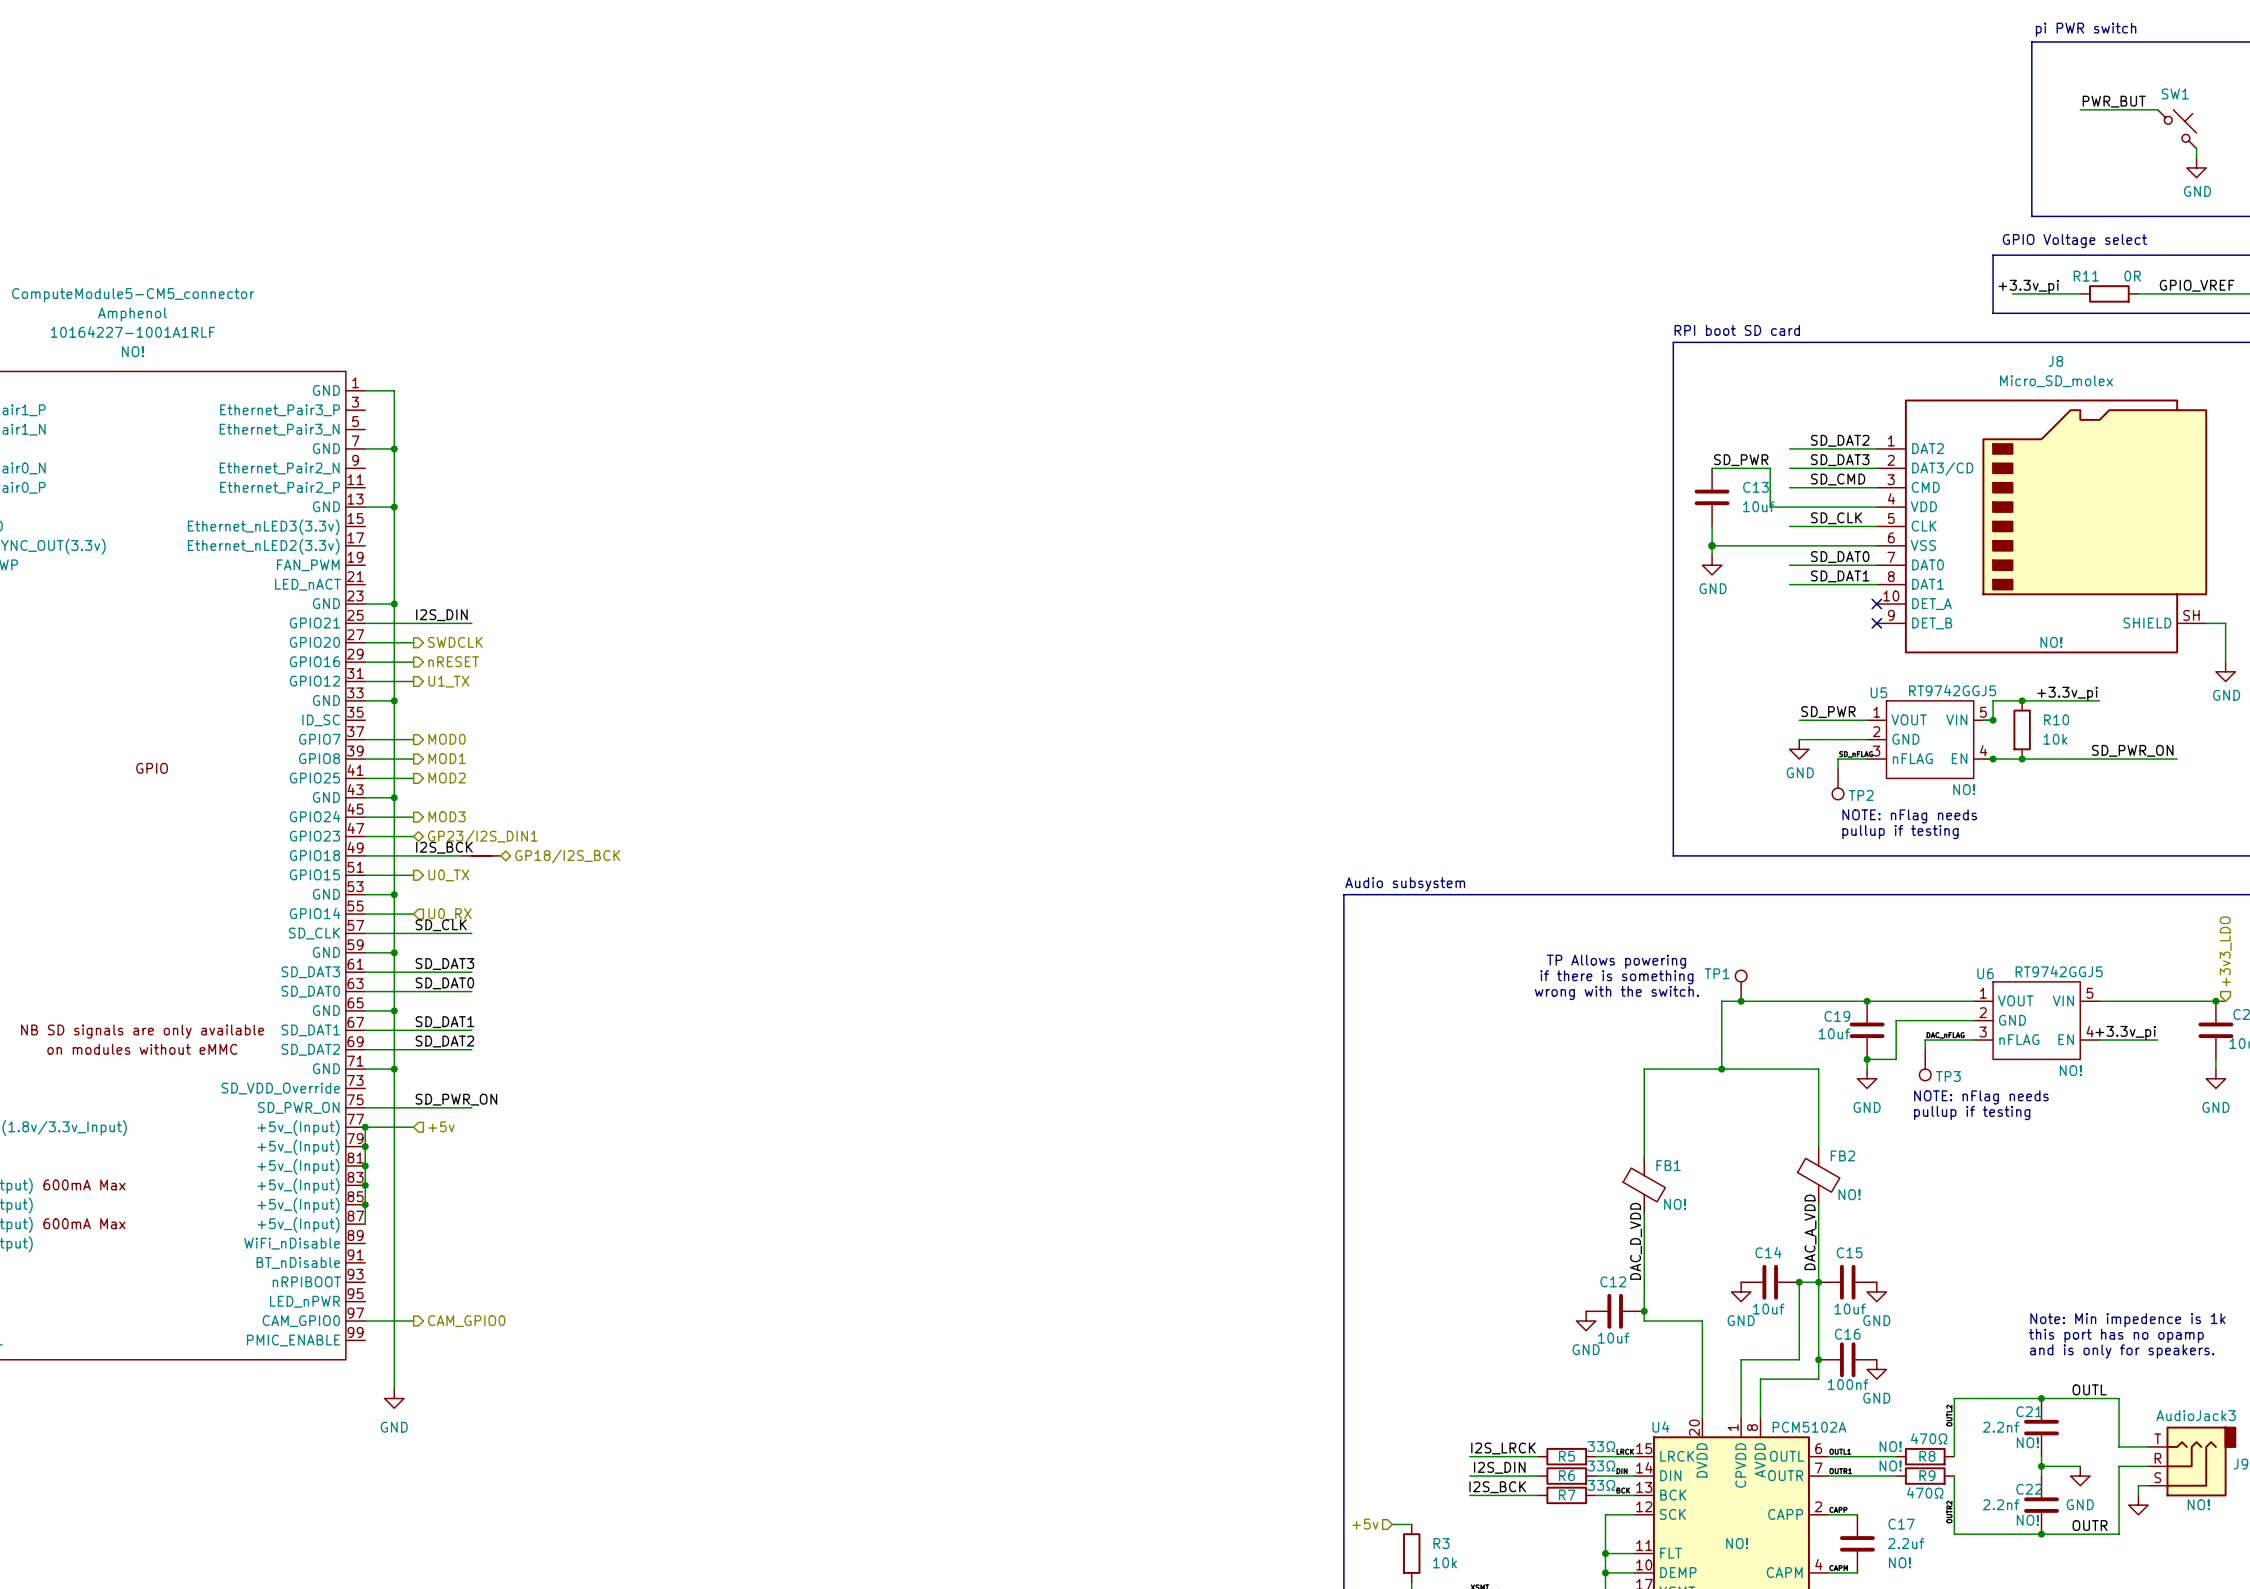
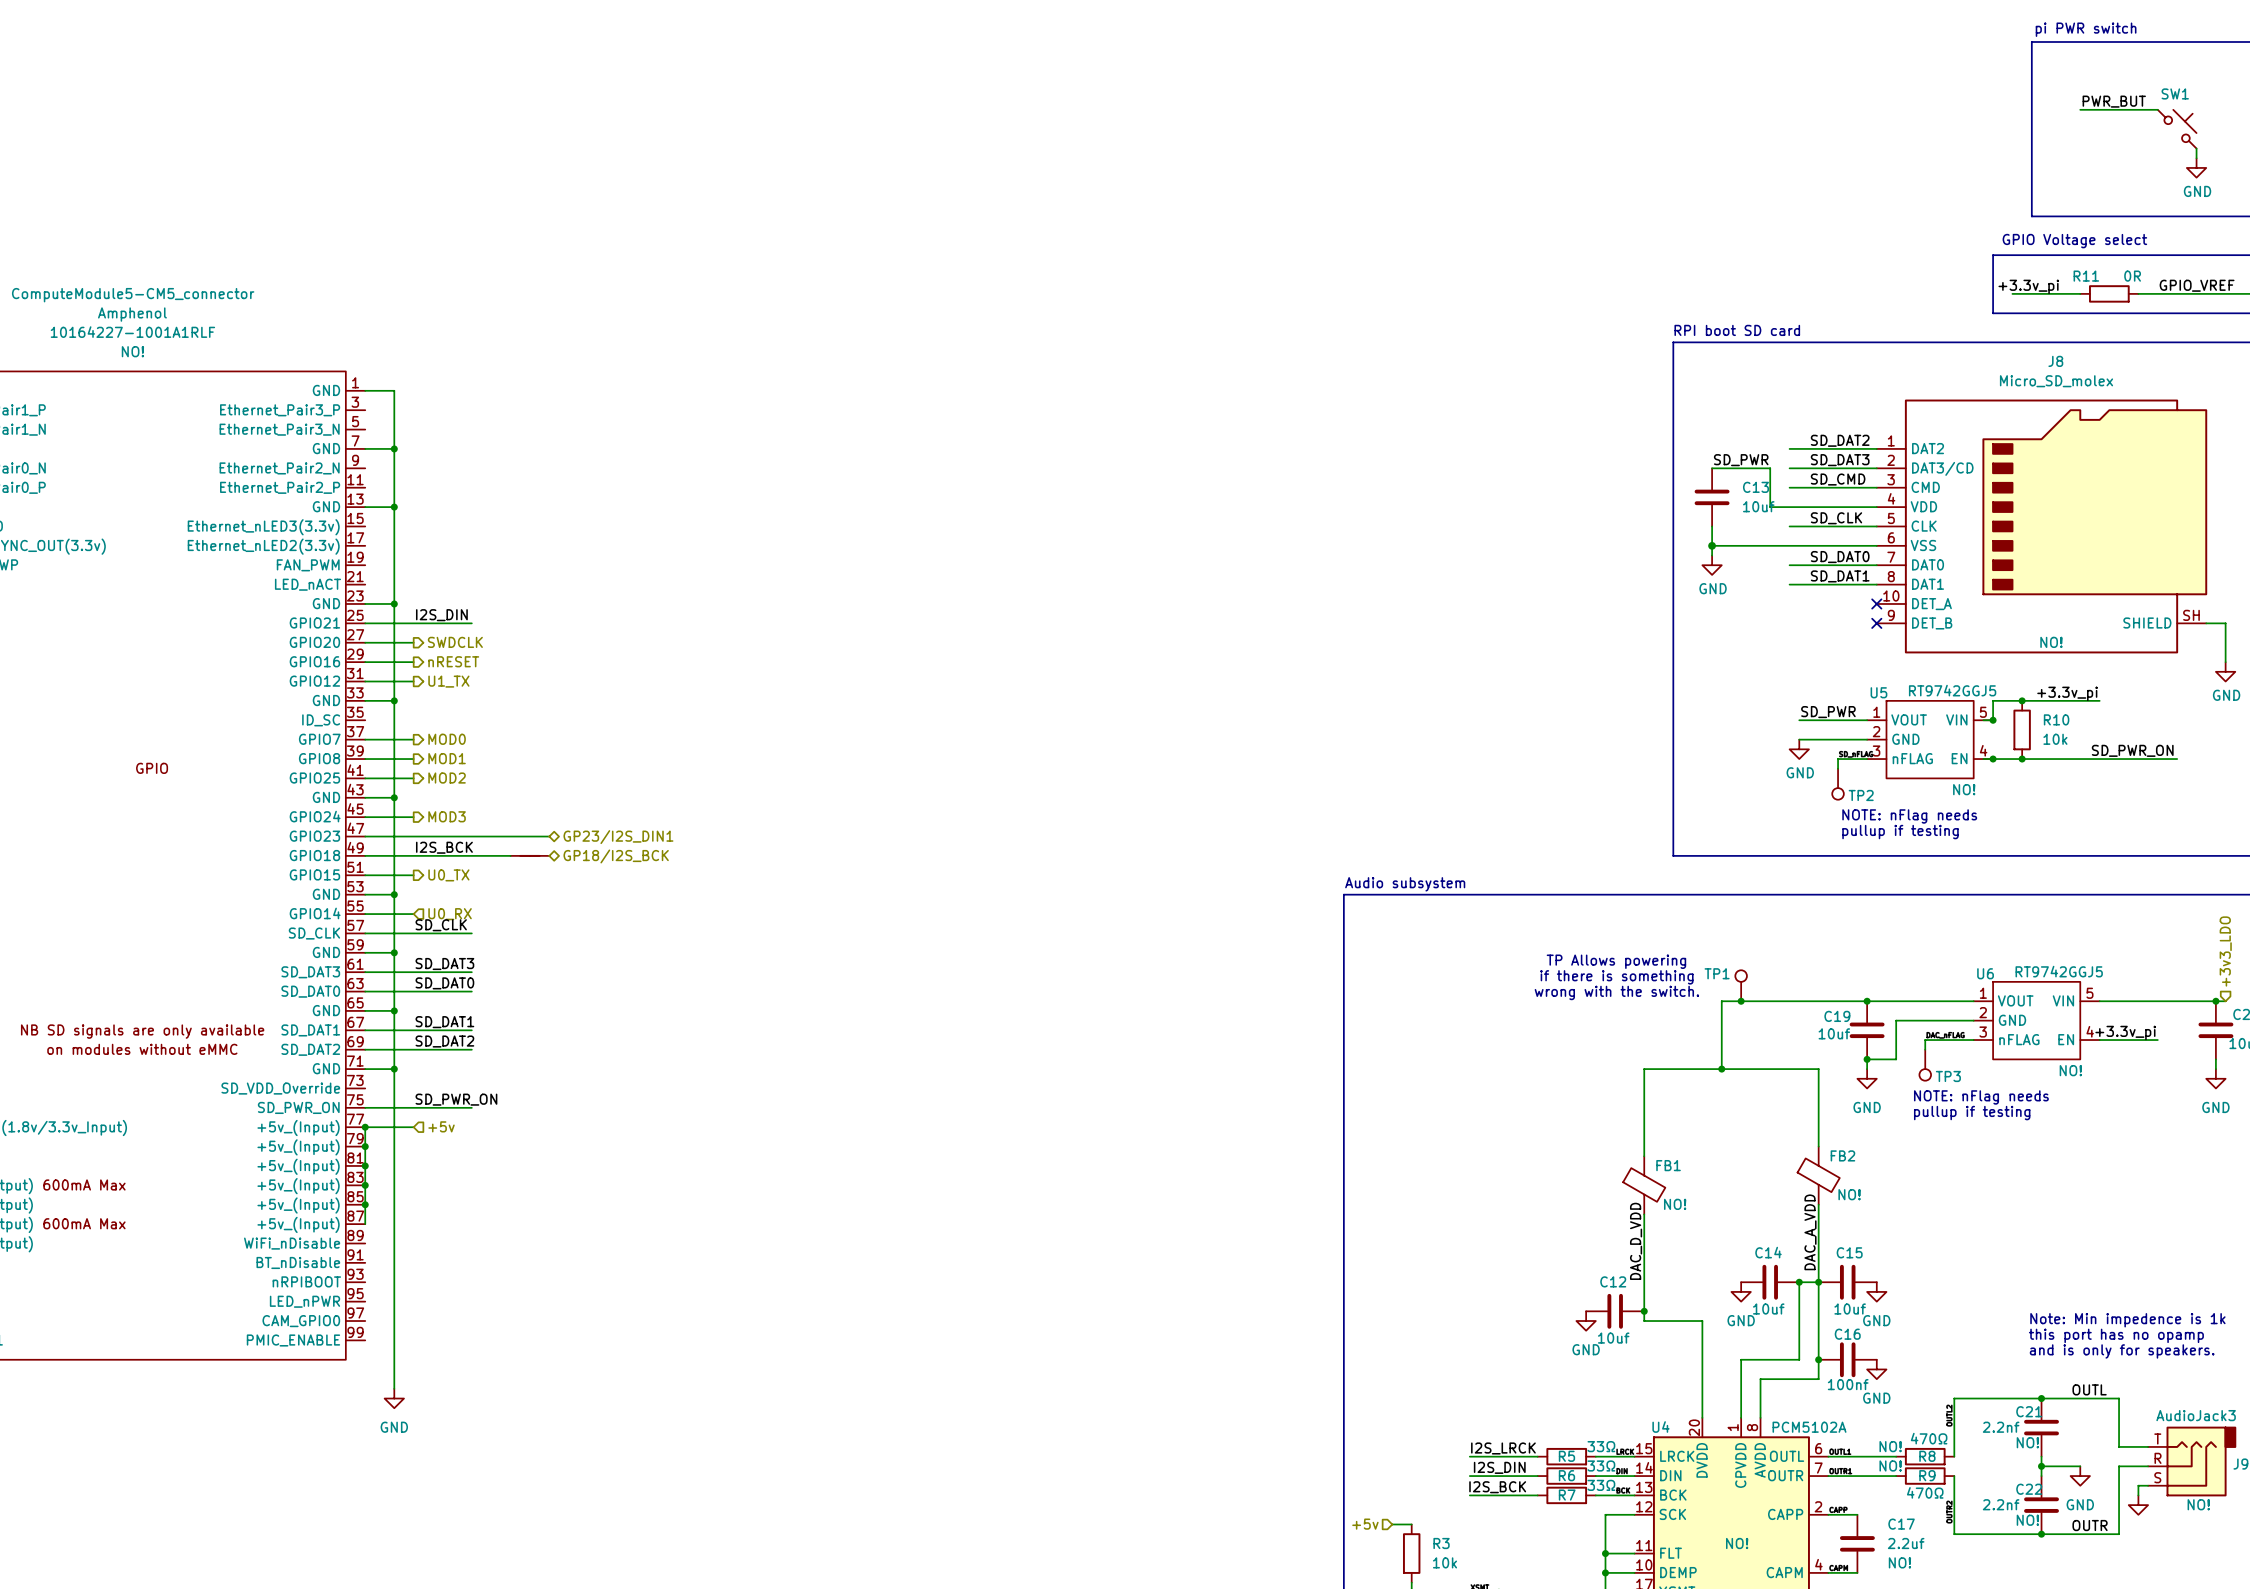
wire: none -> (413, 836) (549, 836)
hierarchical label position: GP23/I2S_DIN1 (482, 837) -> GP23/I2S_DIN1 (618, 837)
part position: (481, 855) -> (529, 855)
hierarchical label position: GP18/I2S_BCK (567, 856) -> GP18/I2S_BCK (616, 856)
wire: (365, 1321) (413, 1321) -> none
hierarchical label: CAM_GPIO0 (466, 1321) -> none

